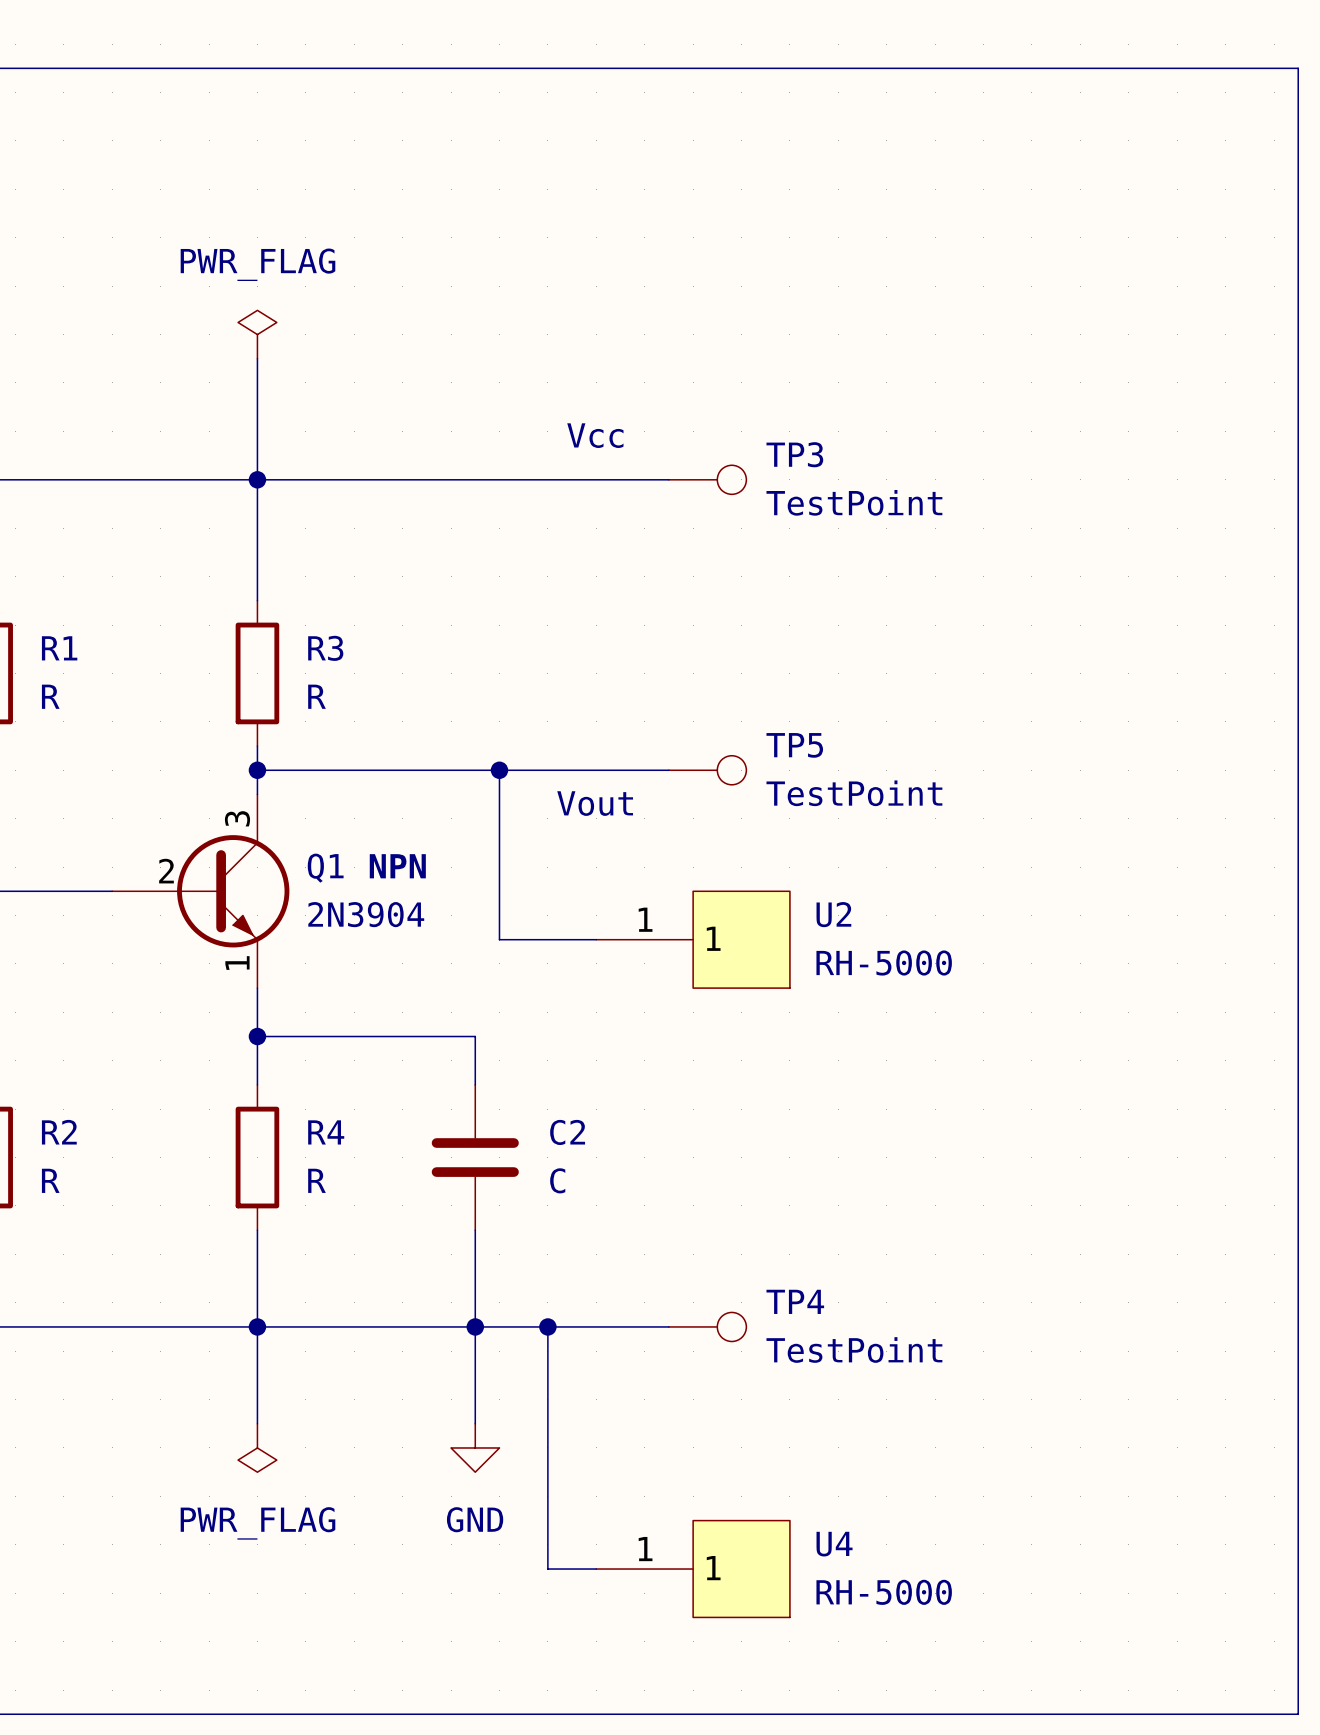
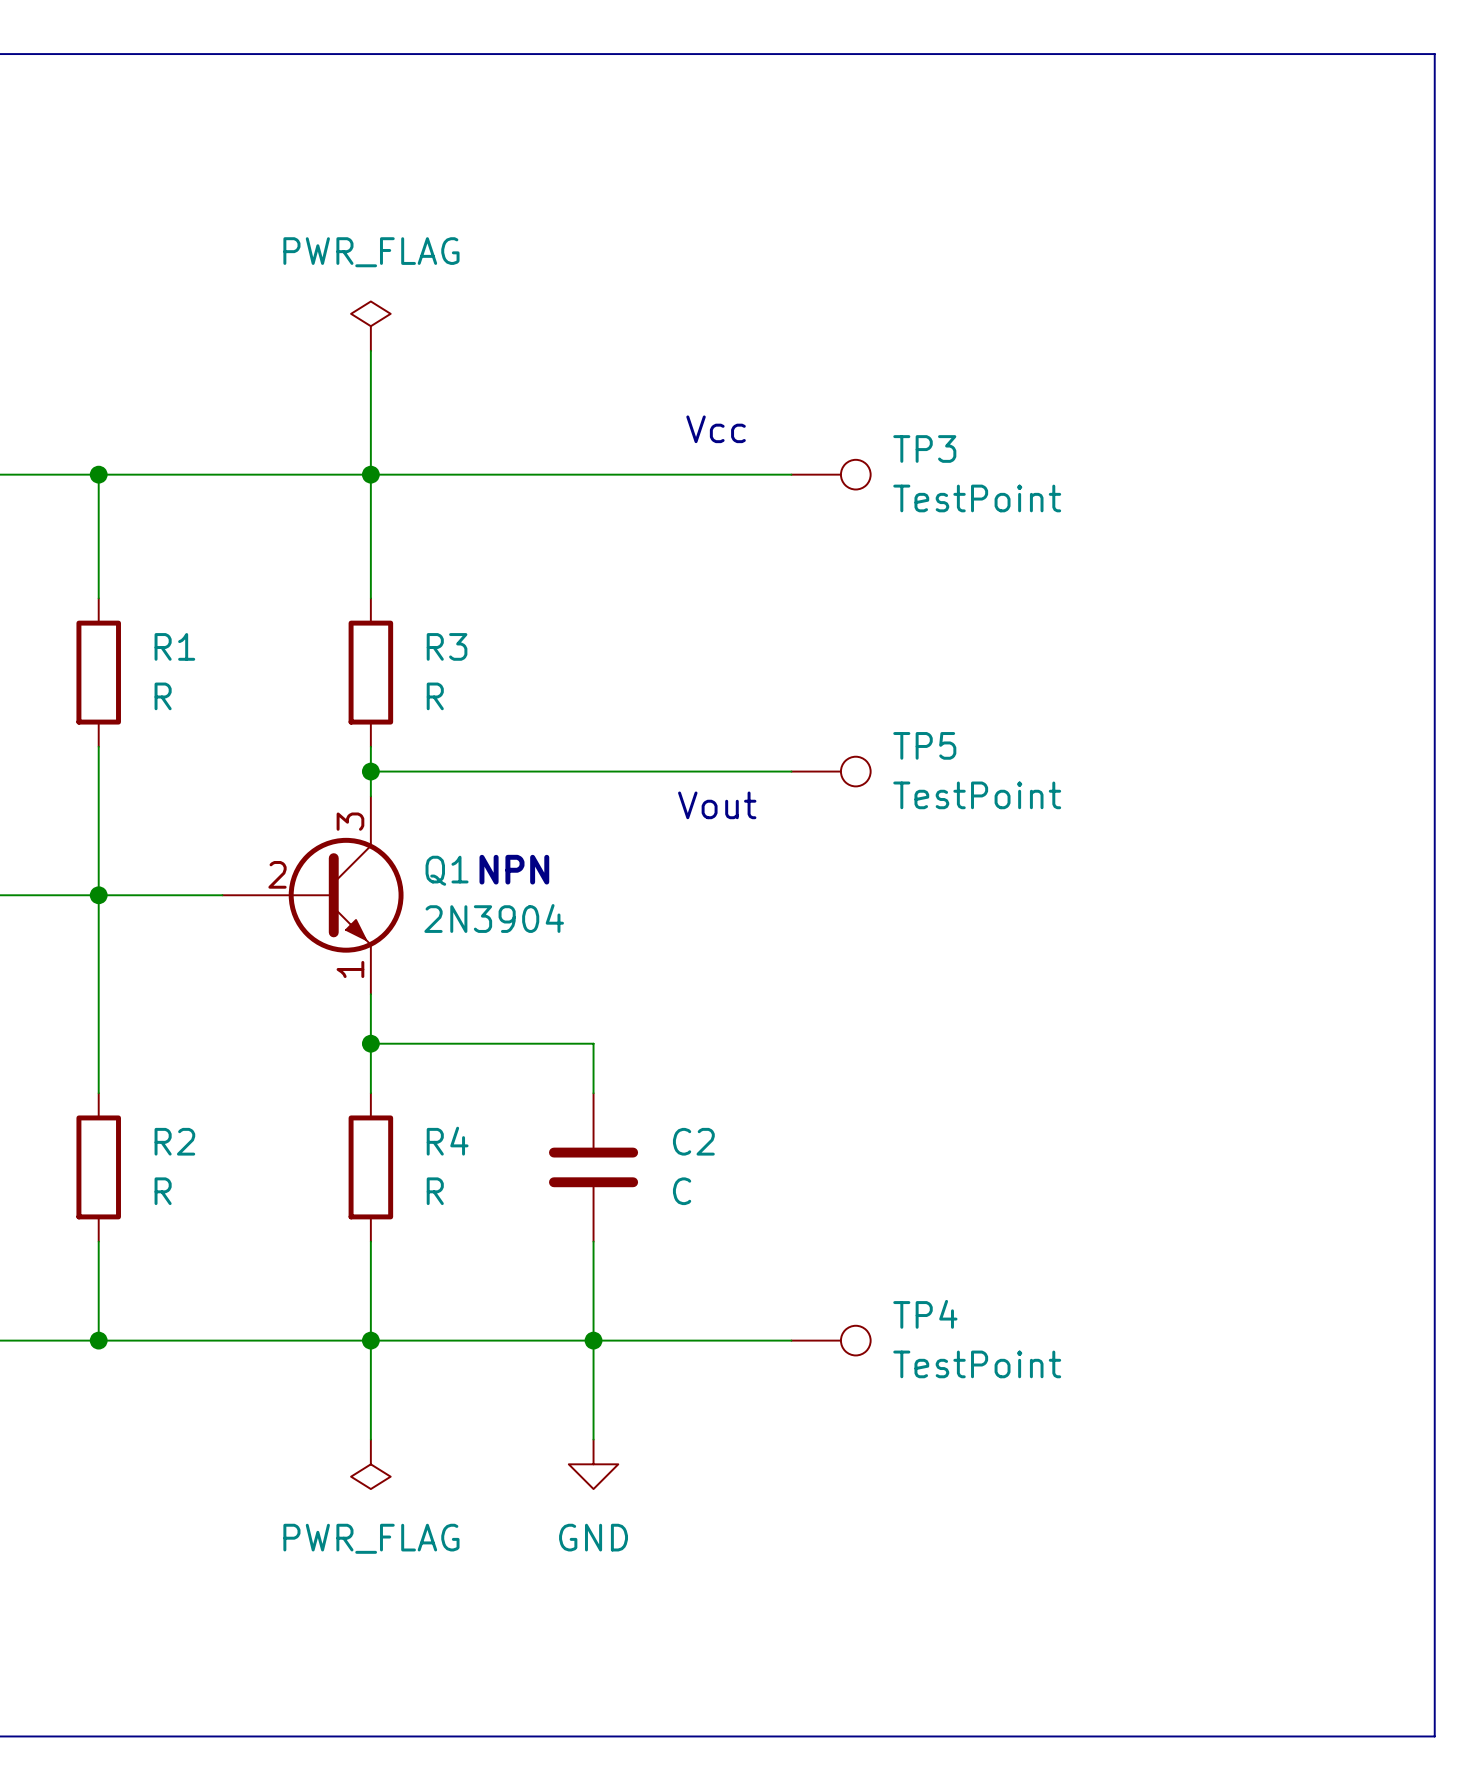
wire: (499, 770) (499, 939) (596, 939) -> none
junction: (499, 770) -> none
U2: RH-5000 (693, 939) -> none
wire: (547, 1326) (547, 1569) (596, 1569) -> none
junction: (547, 1326) -> none
U4: RH-5000 (693, 1569) -> none

